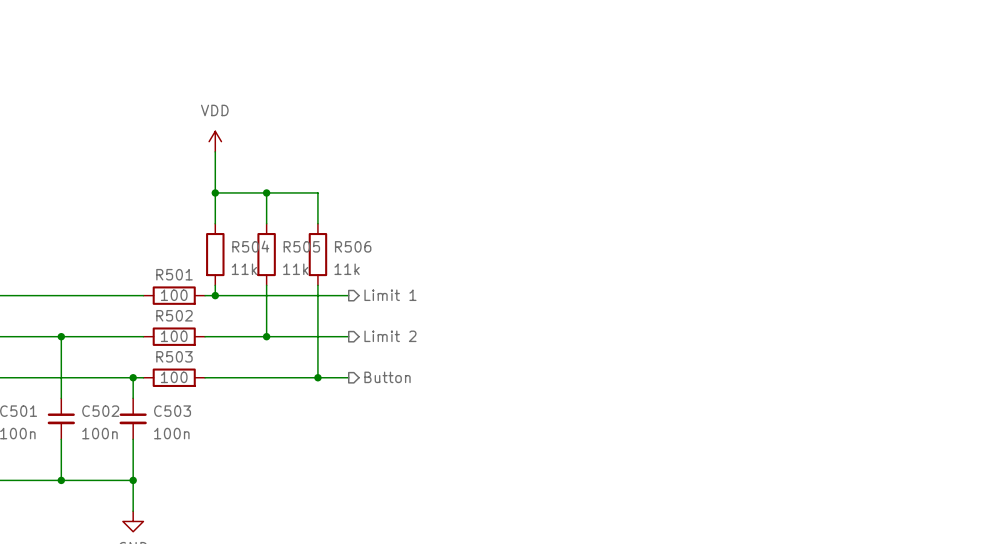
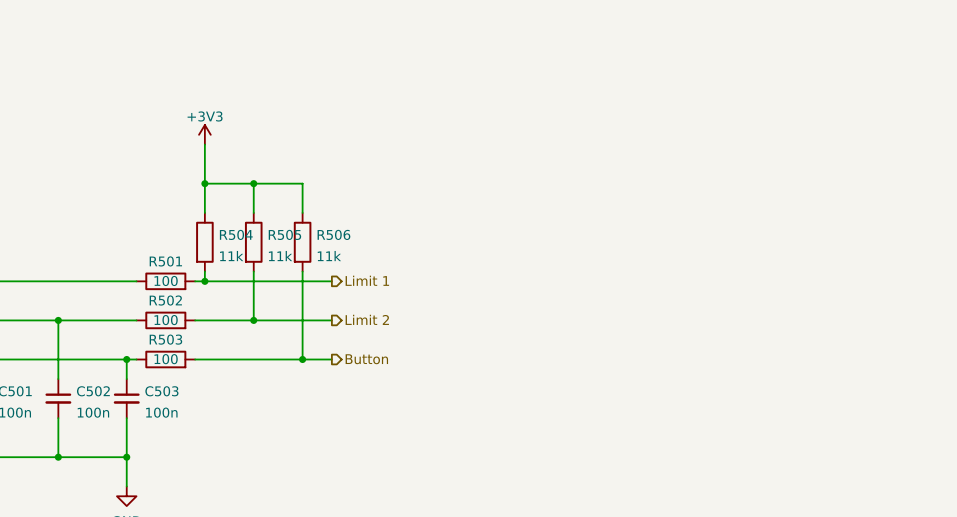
power symbol: VDD (215, 141) -> +3V3 (204, 134)

